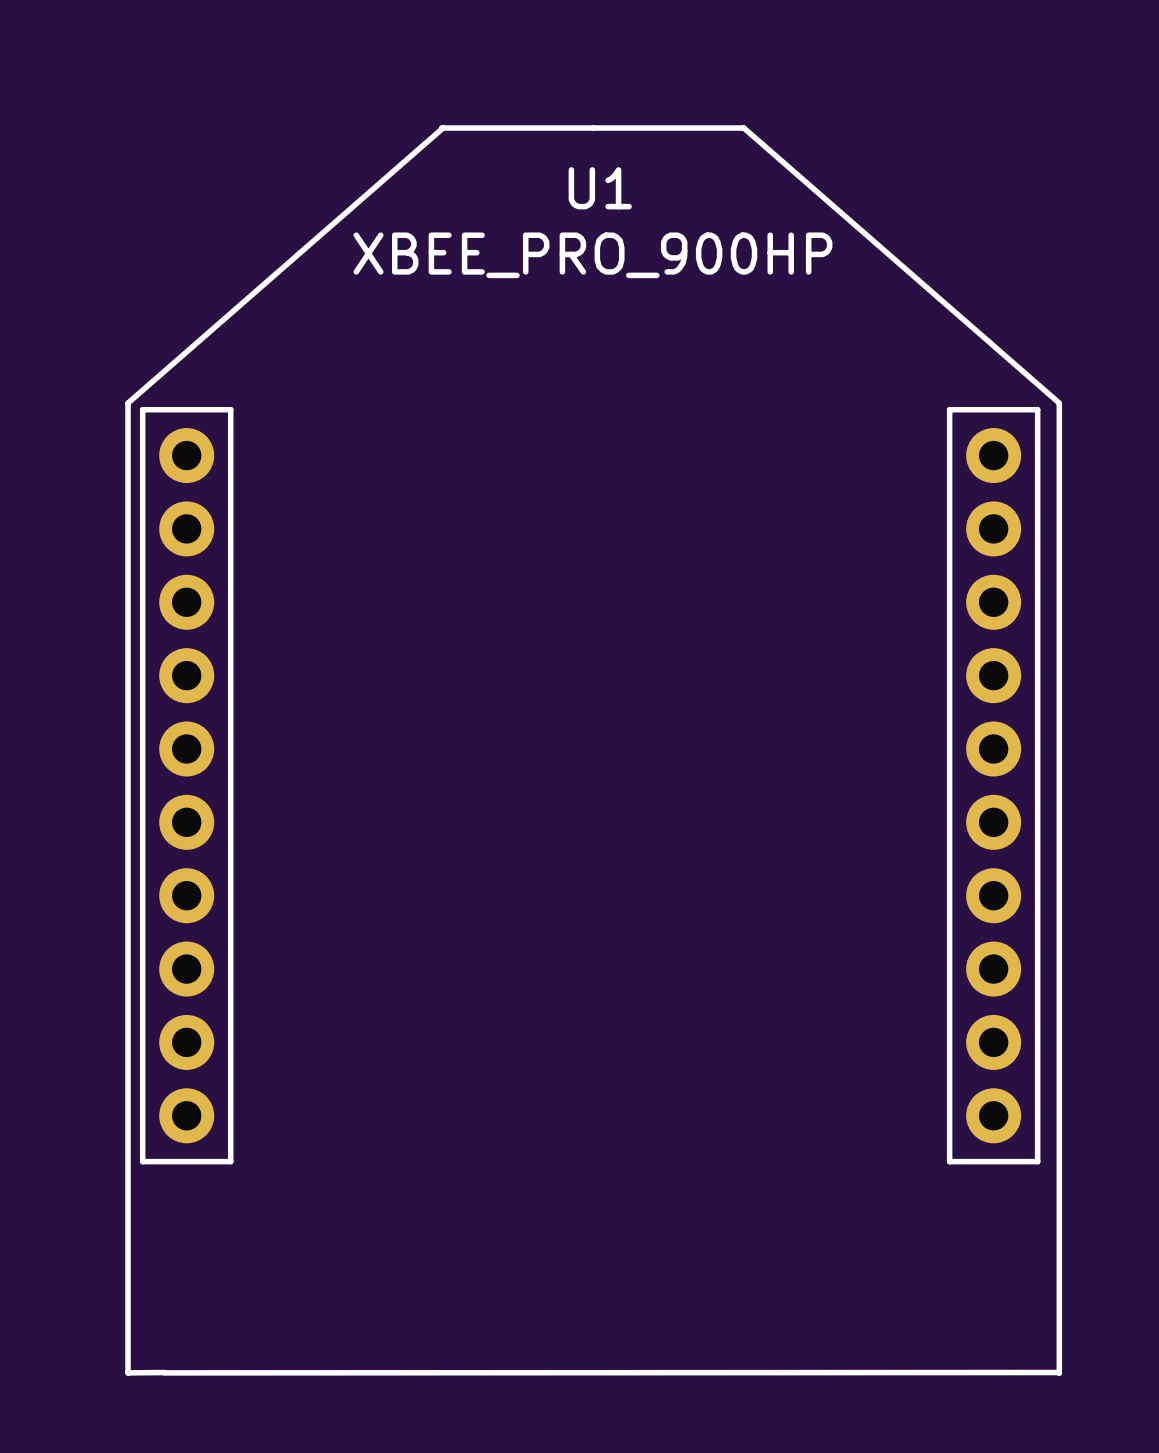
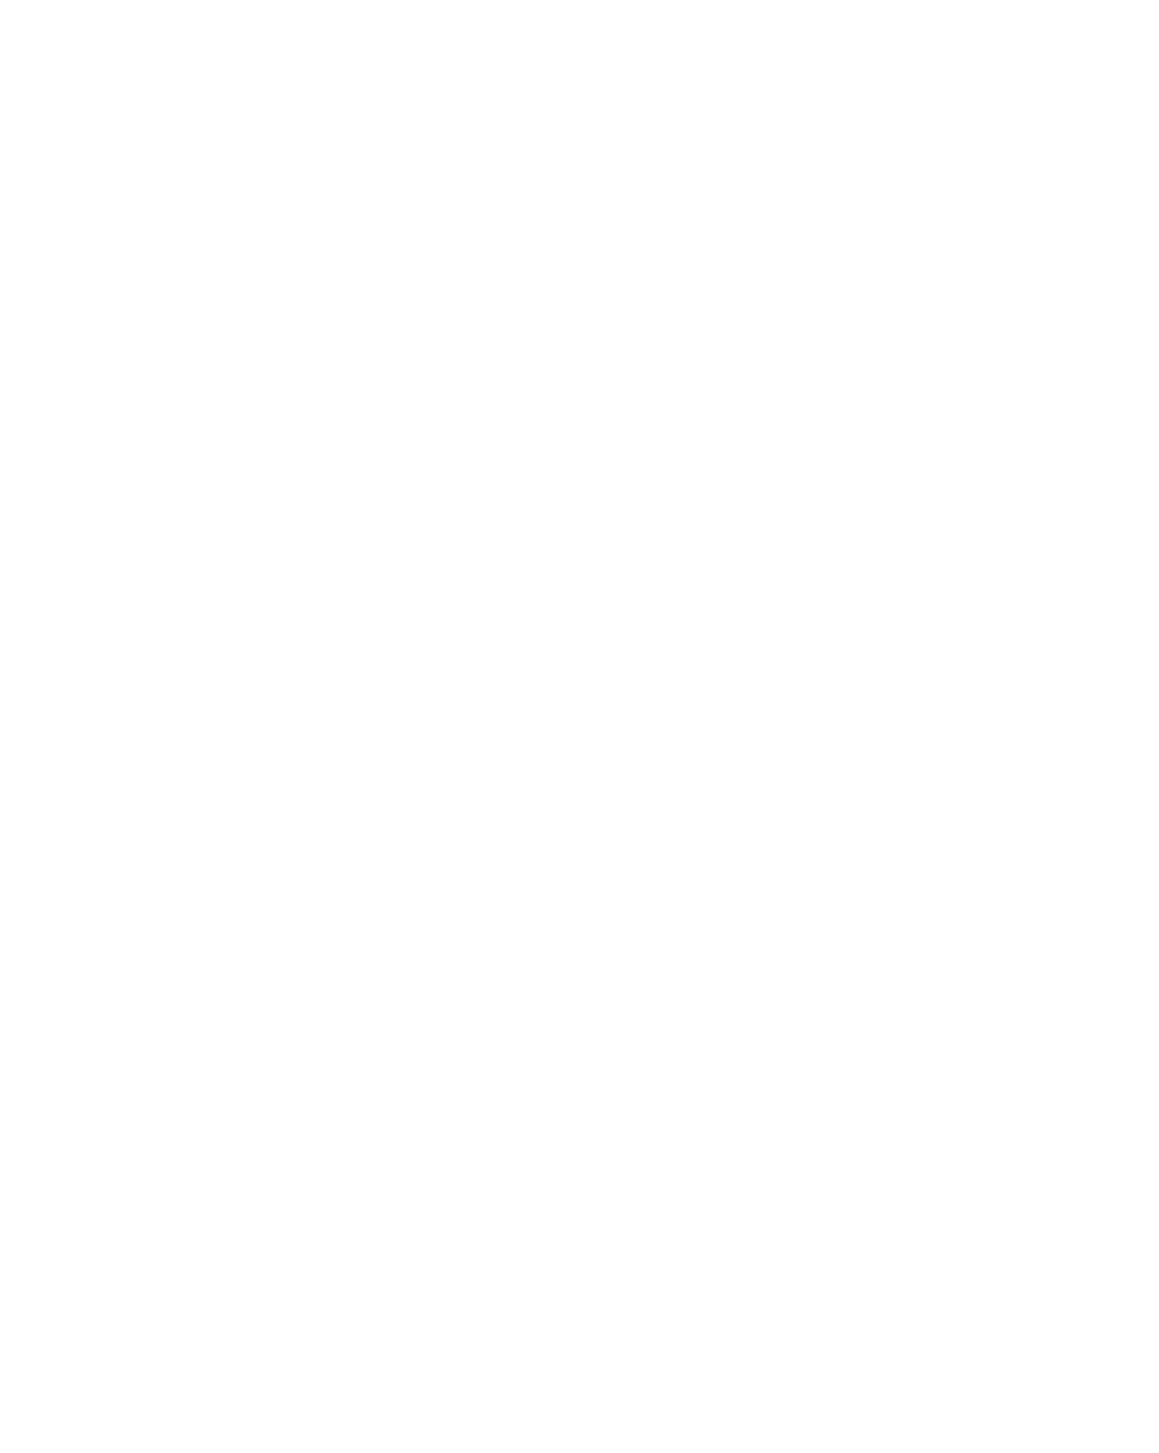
U1: XBEE_PRO_900HP (593, 750) -> none

